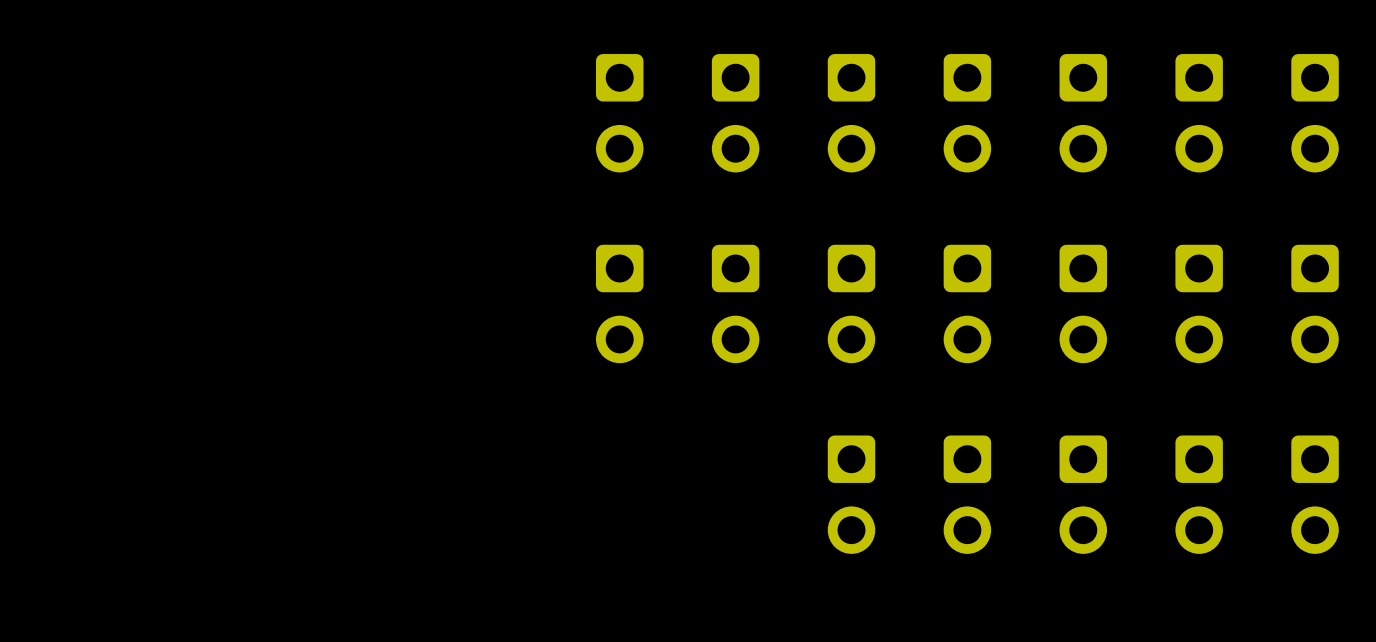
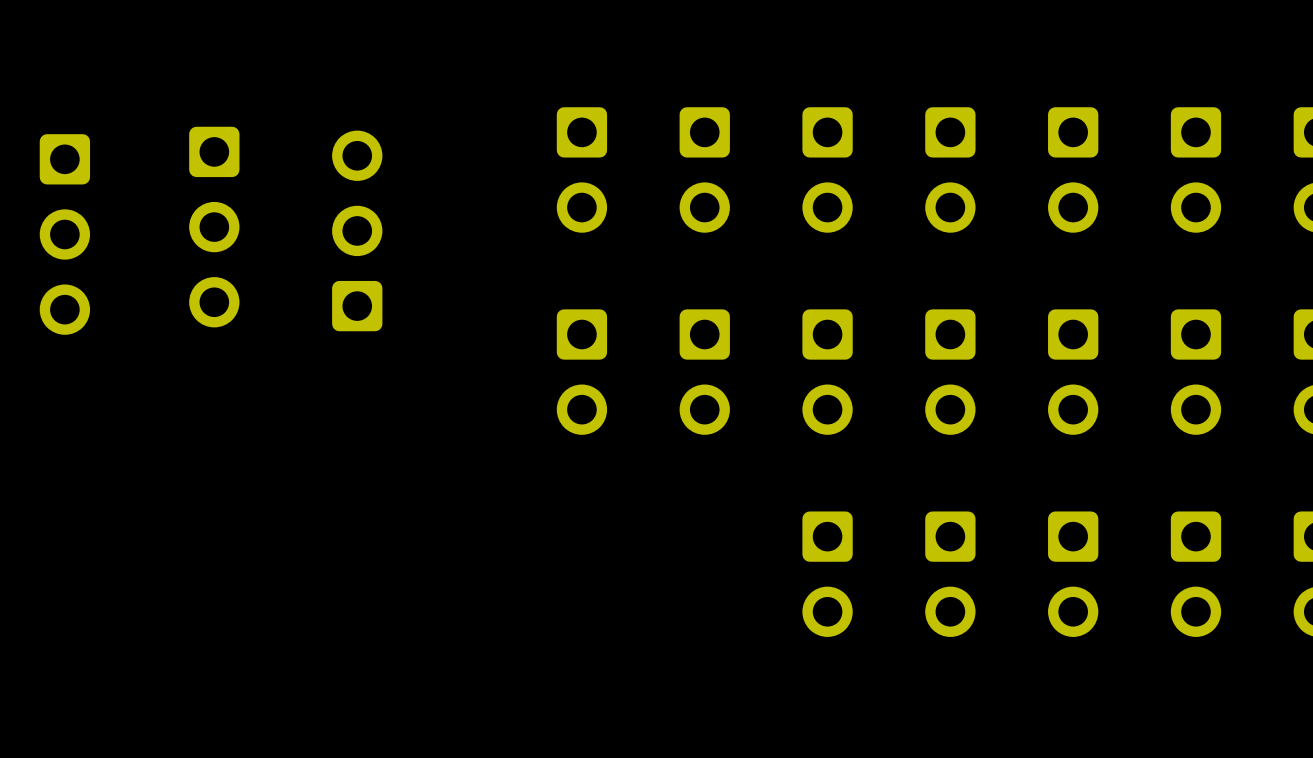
part: none -> (214, 227)
part: none -> (357, 230)
part: none -> (64, 234)

